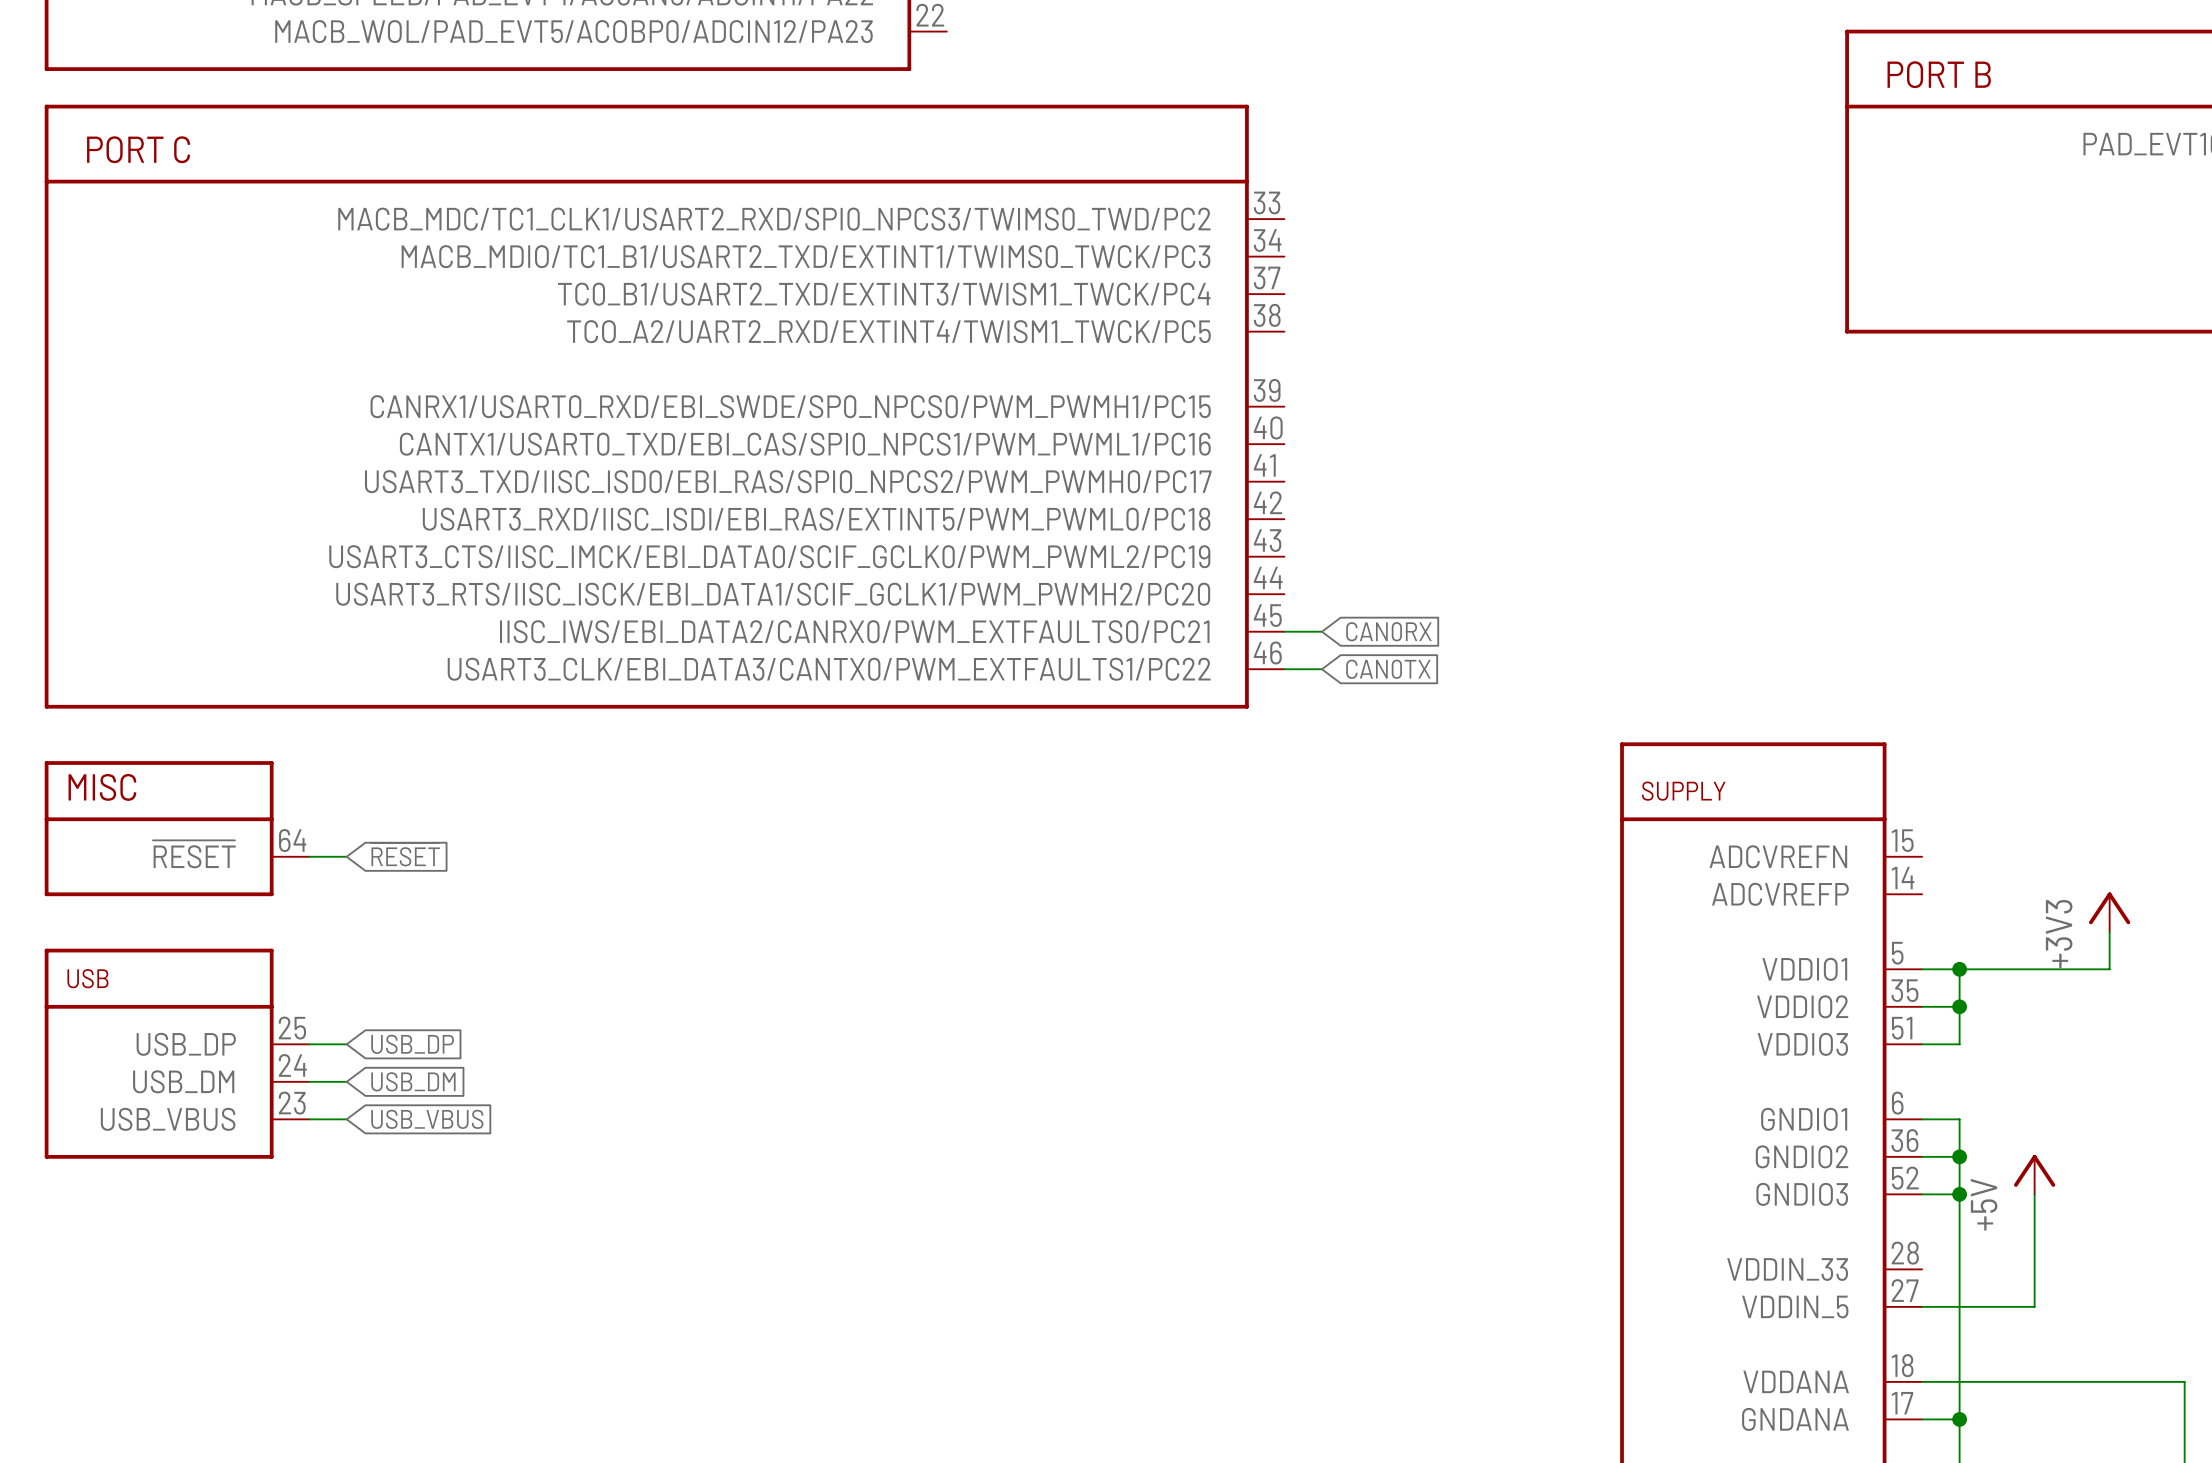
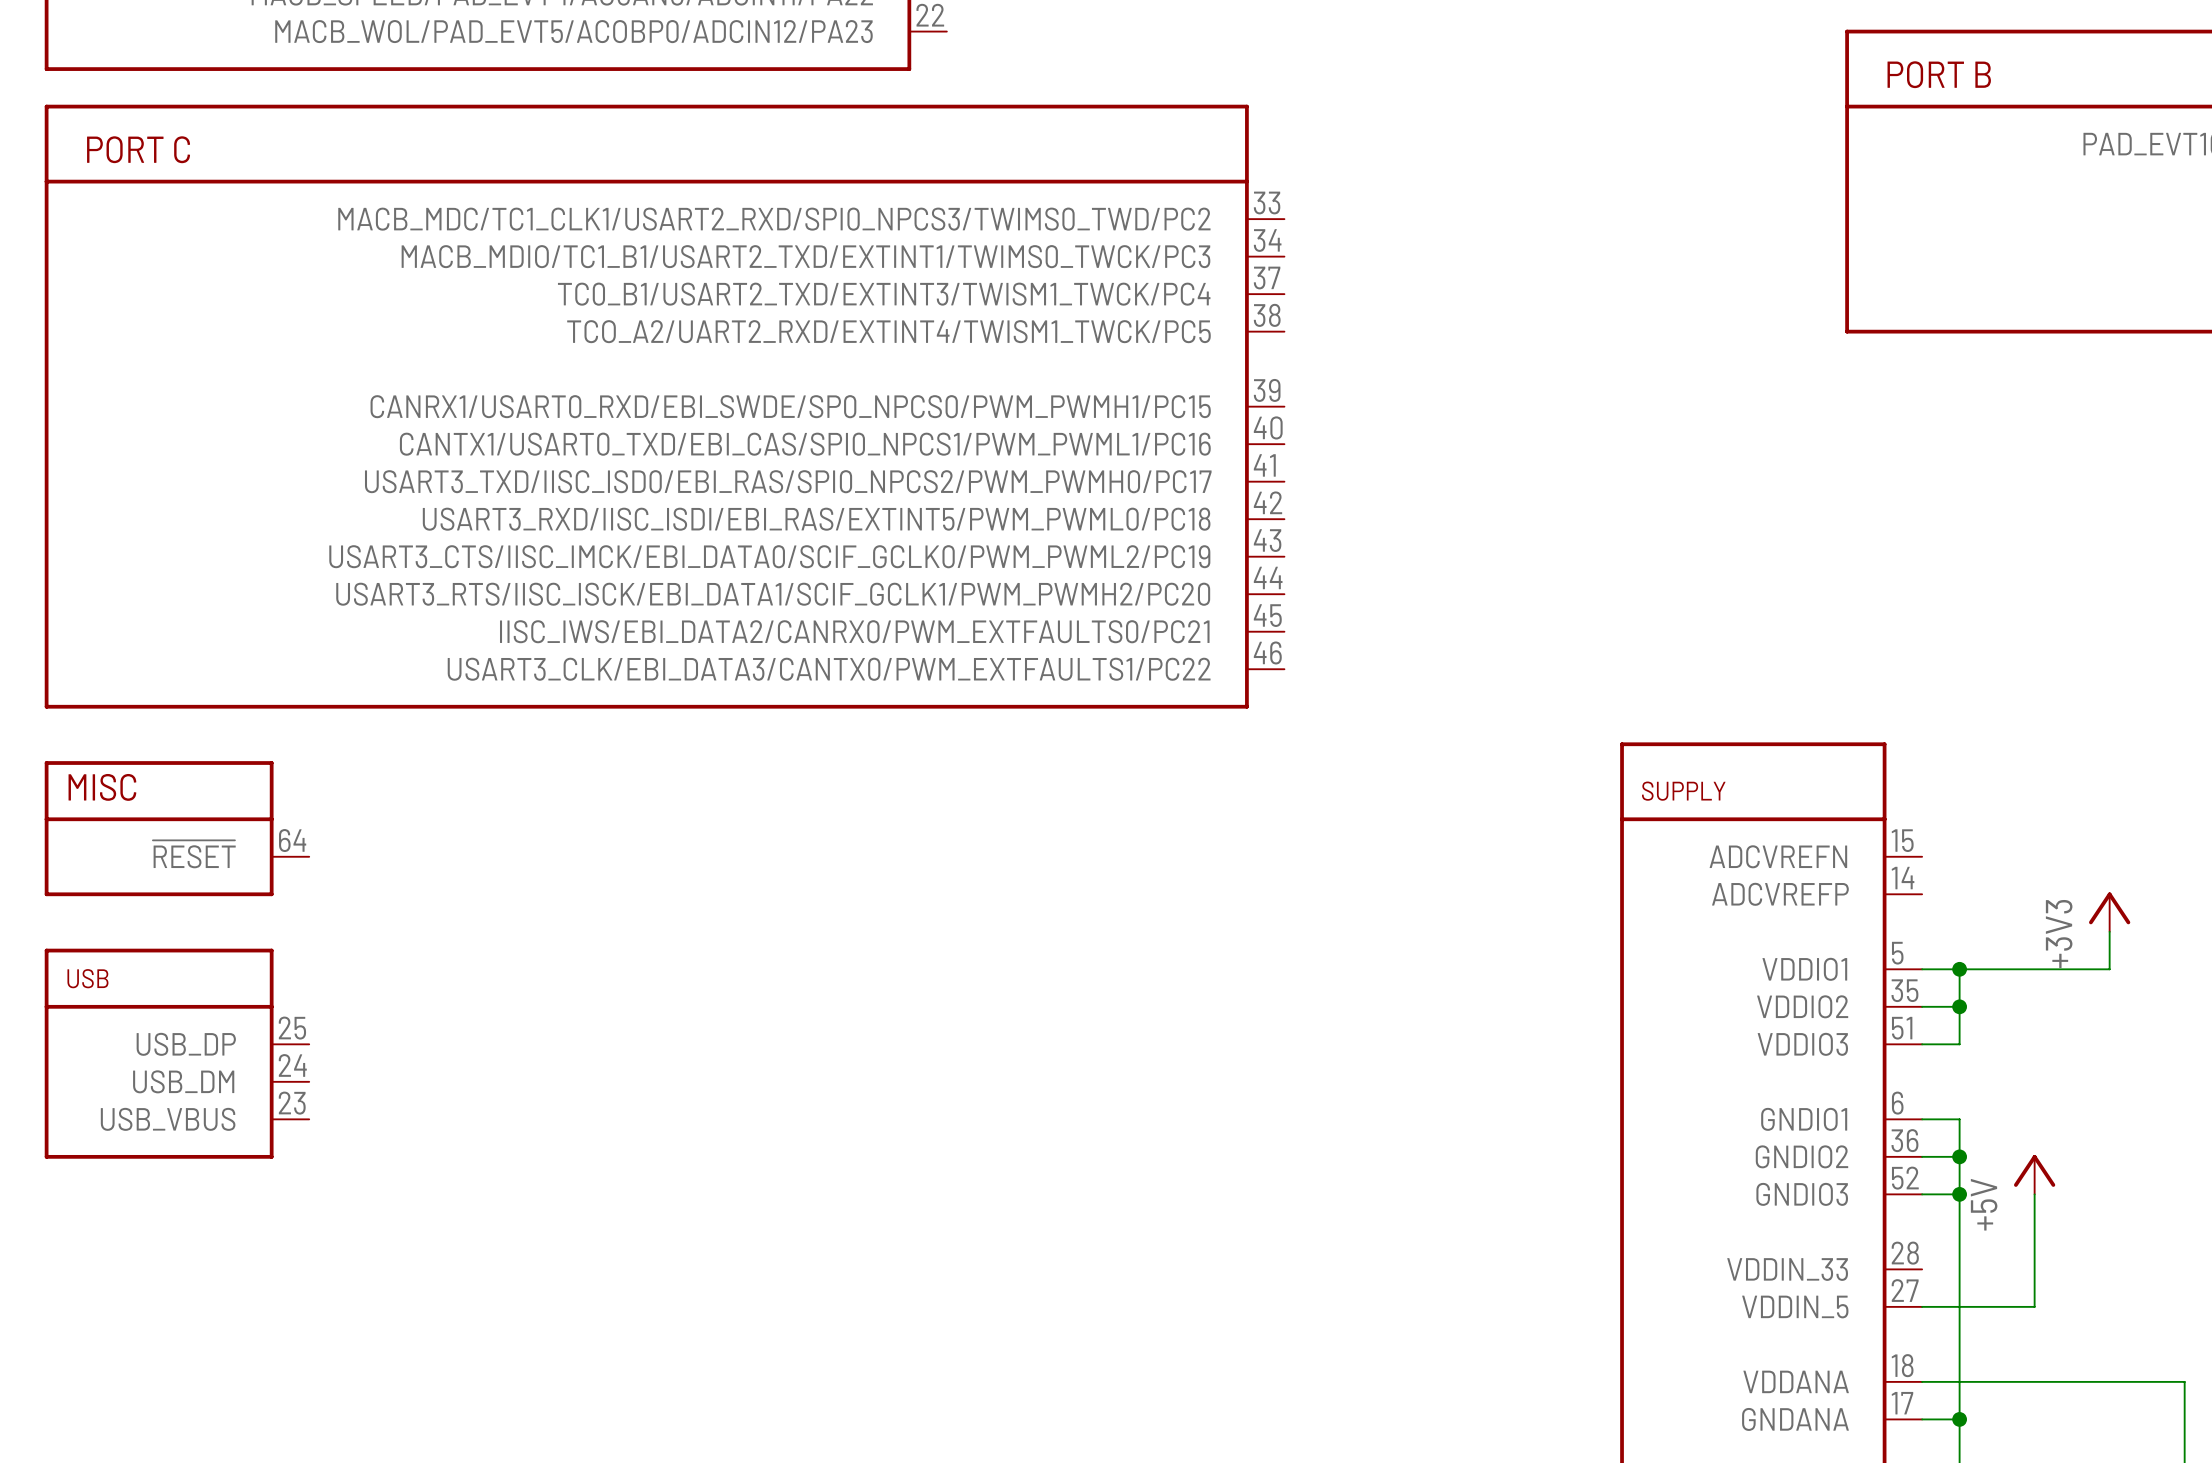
wire: (1284, 631) (1321, 631) -> none
global label: CAN0RX (1388, 631) -> none
wire: (1284, 669) (1321, 669) -> none
global label: CAN0TX (1388, 669) -> none
global label: ~{RESET} (405, 854) -> none
wire: (309, 856) (346, 856) -> none
wire: (309, 1044) (346, 1044) -> none
global label: USB_DP (412, 1044) -> none
wire: (309, 1081) (346, 1081) -> none
global label: USB_DM (413, 1081) -> none
wire: (309, 1119) (346, 1119) -> none
global label: USB_VBUS (427, 1119) -> none

